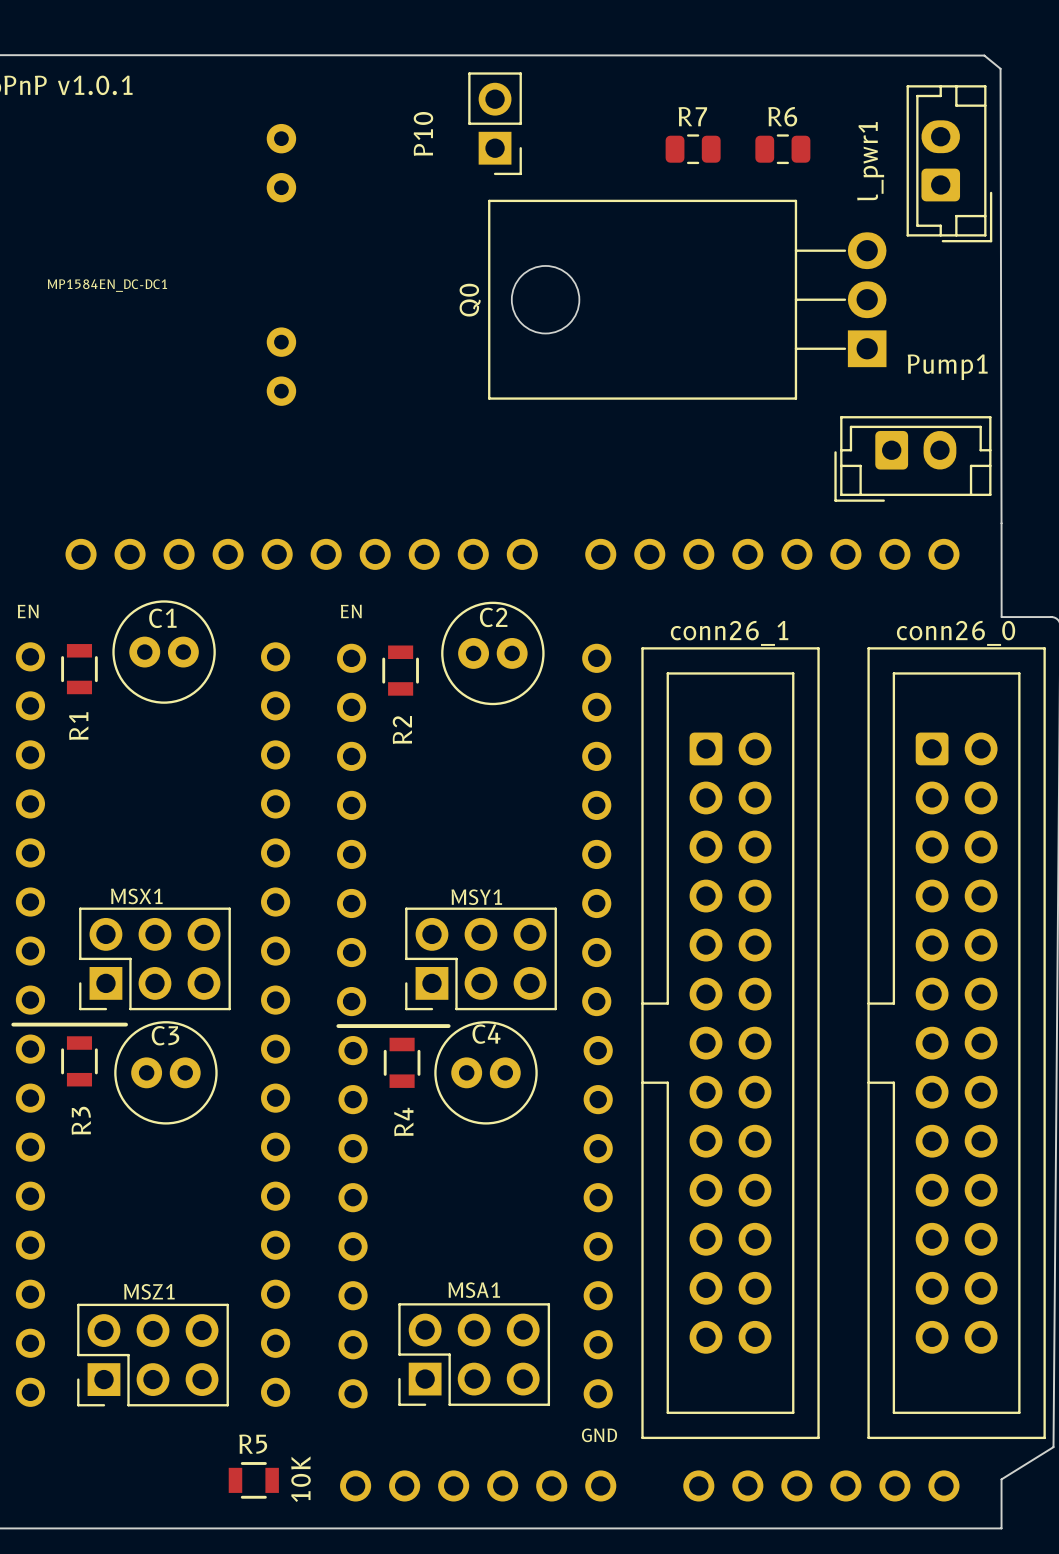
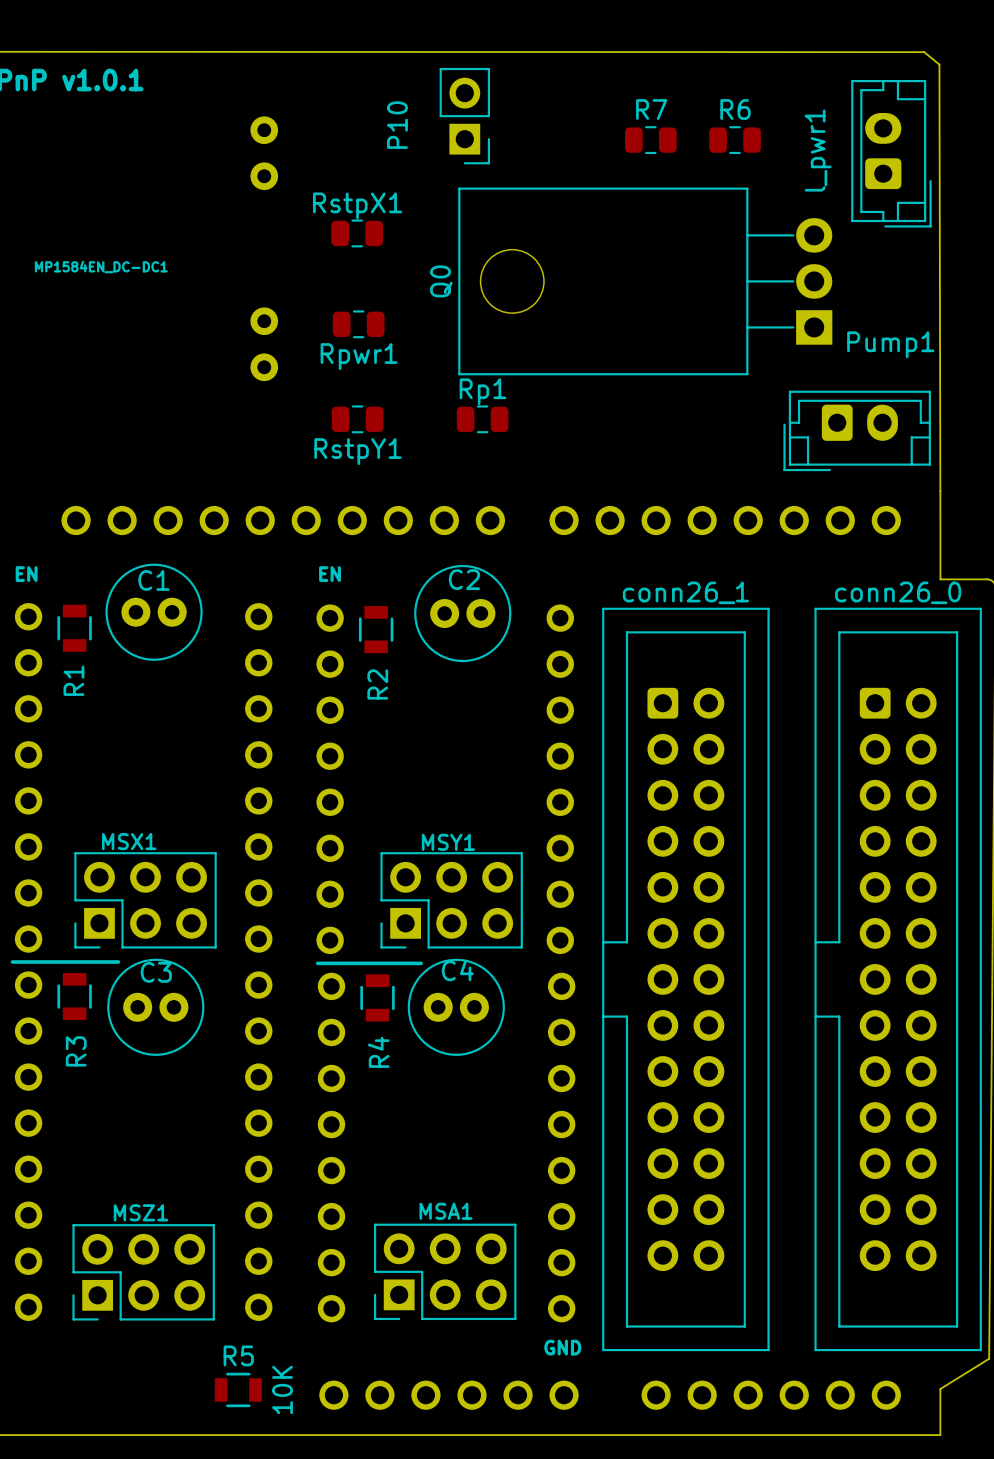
RstpX1: none -> (357, 233)
Rpwr1: none -> (358, 324)
RstpY1: none -> (357, 419)
Rp1: none -> (482, 419)

